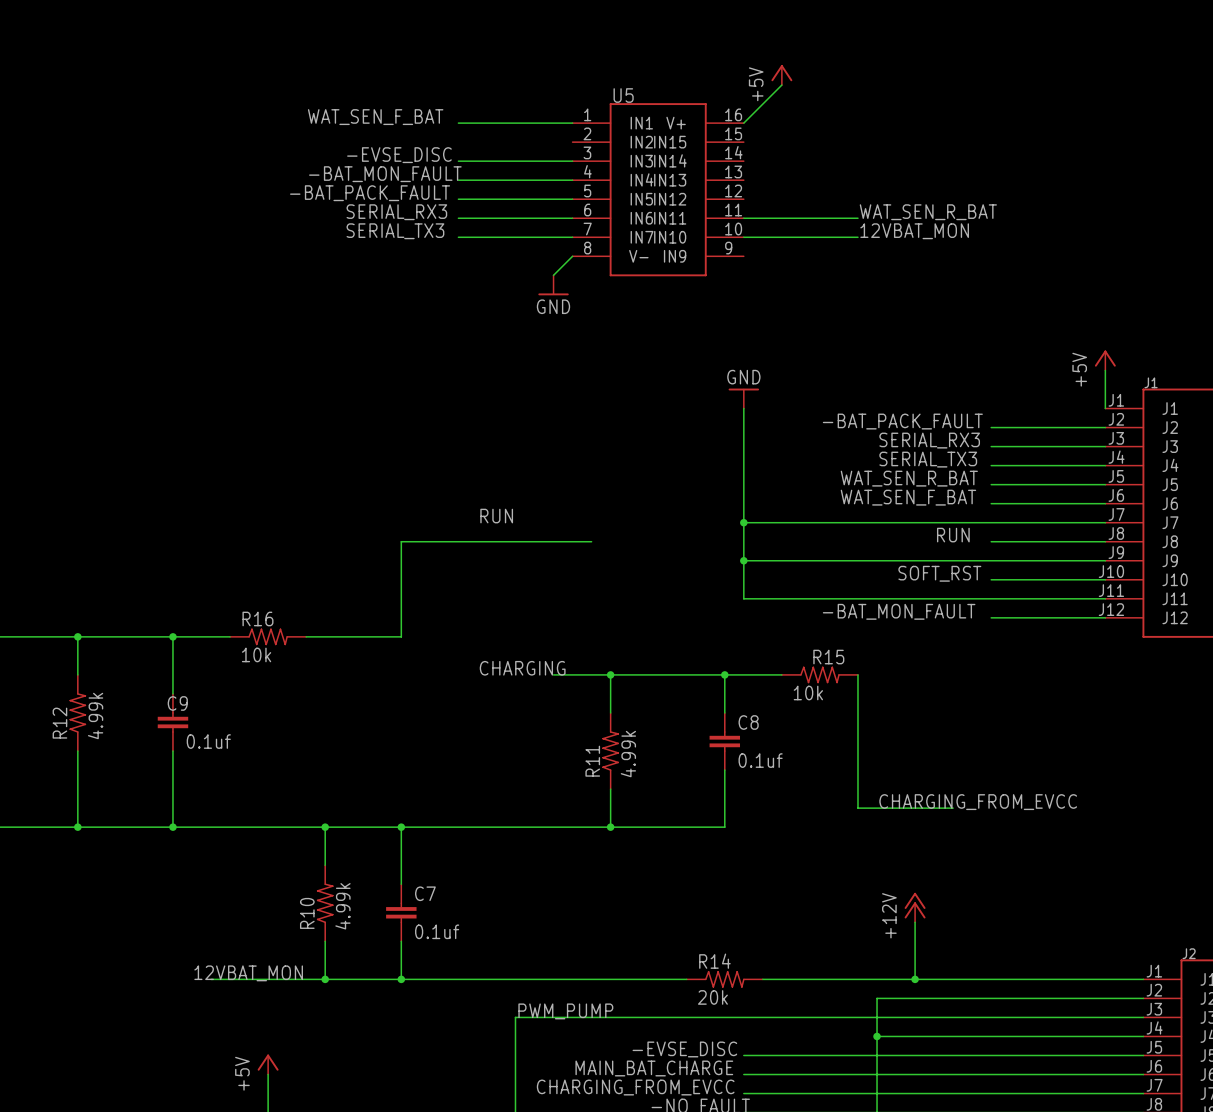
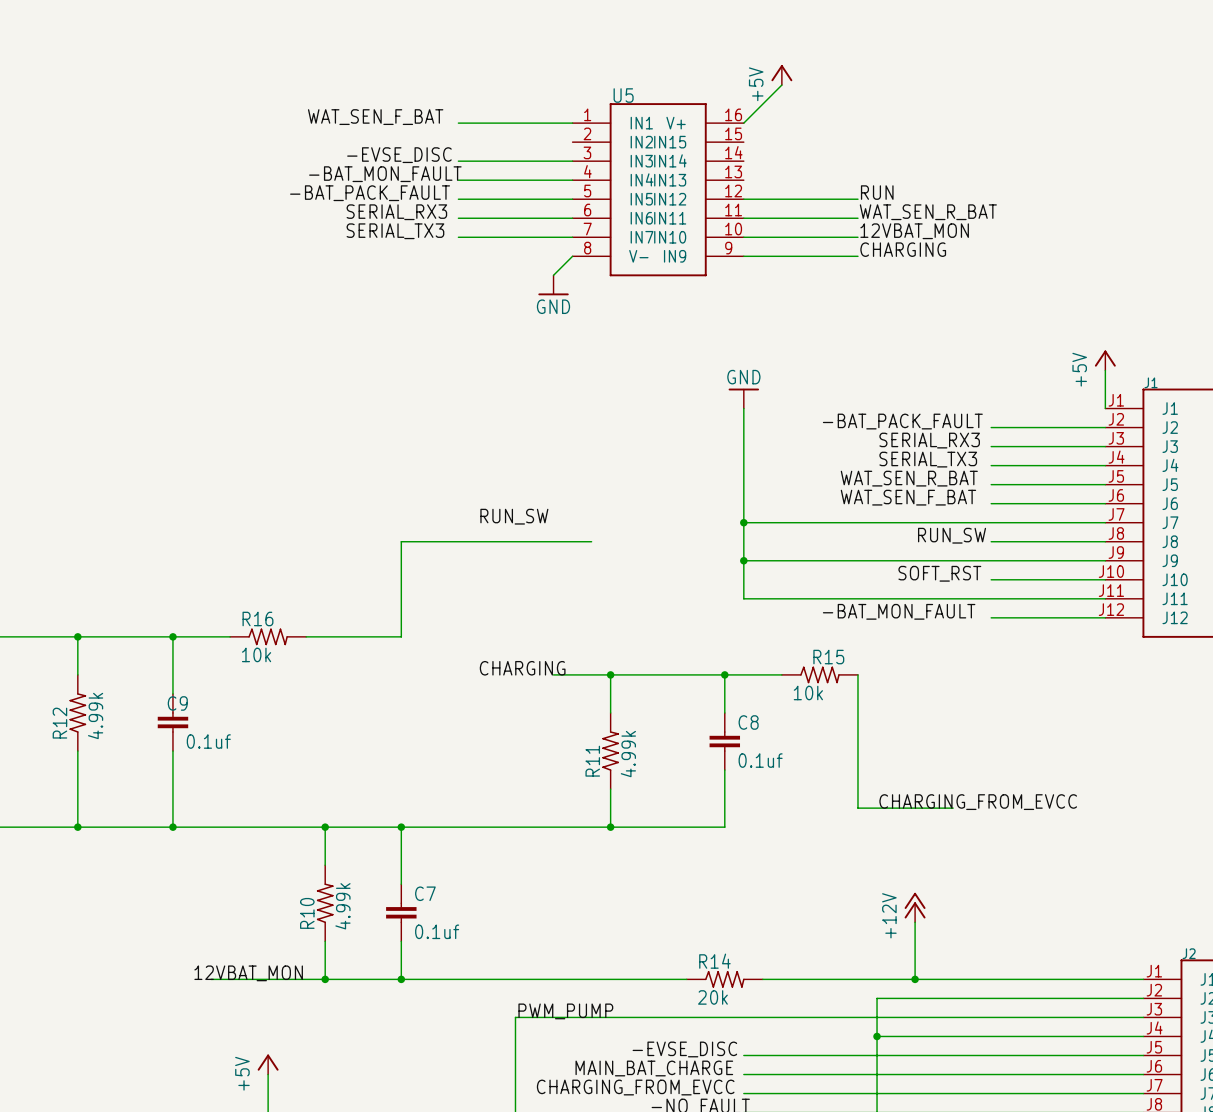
label: none -> RUN (877, 192)
wire: none -> (743, 199) (857, 199)
label: none -> CHARGING (903, 249)
wire: none -> (743, 256) (857, 256)
label: RUN (496, 516) -> RUN_SW (514, 516)
label: RUN (953, 535) -> RUN_SW (952, 535)

